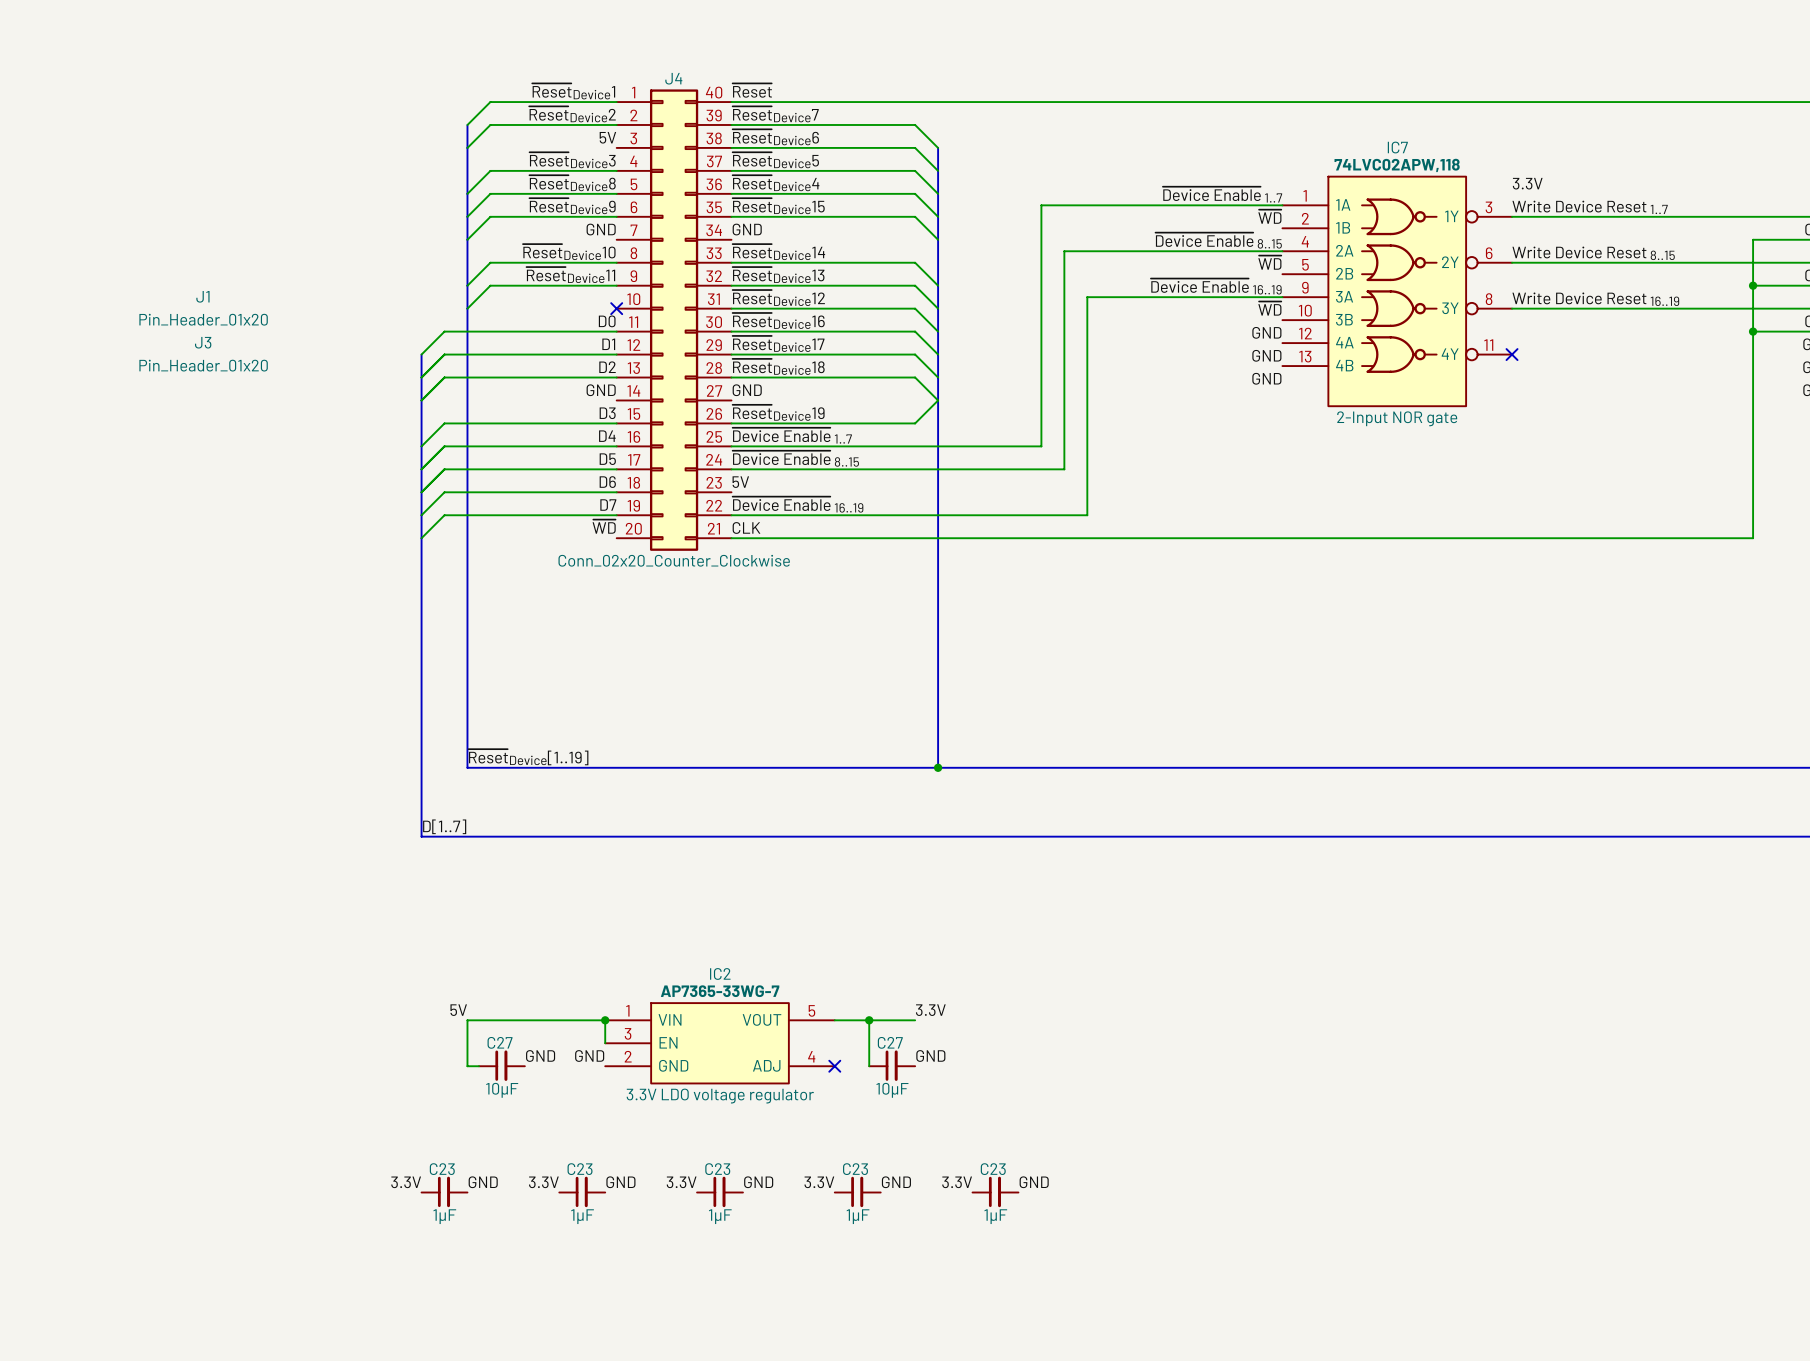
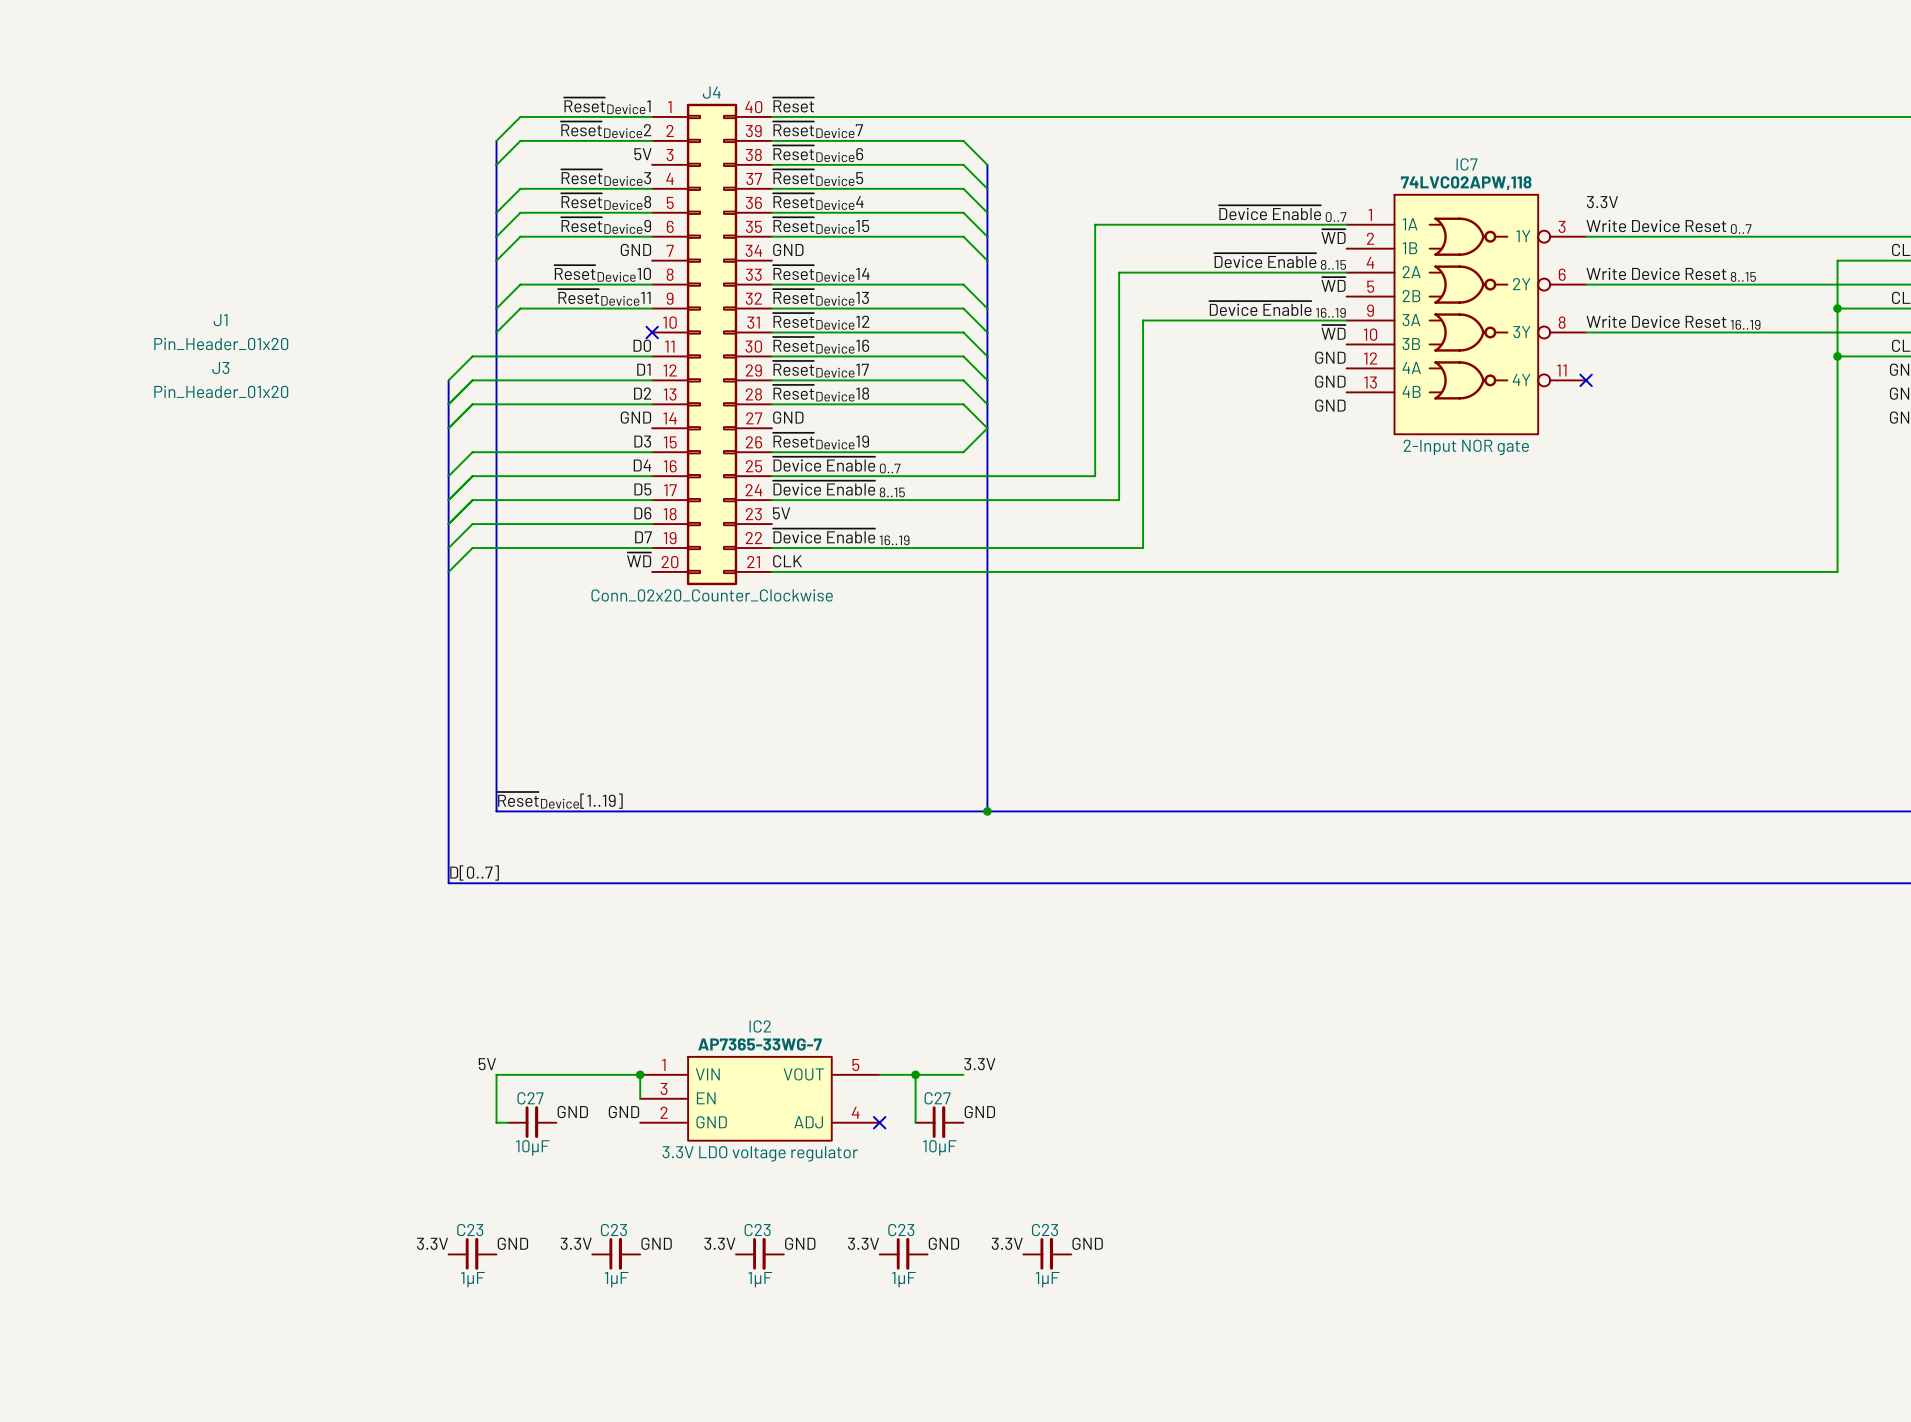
label: ~{Device Enable} 1..7 (1222, 194) -> ~{Device Enable} 0..7 (1282, 213)
label: Write Device Reset 1..7 (1590, 207) -> Write Device Reset 0..7 (1669, 226)
label: ~{Device Enable} 1..7 (792, 435) -> ~{Device Enable} 0..7 (836, 465)
label: D[1..7] (444, 826) -> D[0..7] (474, 872)

